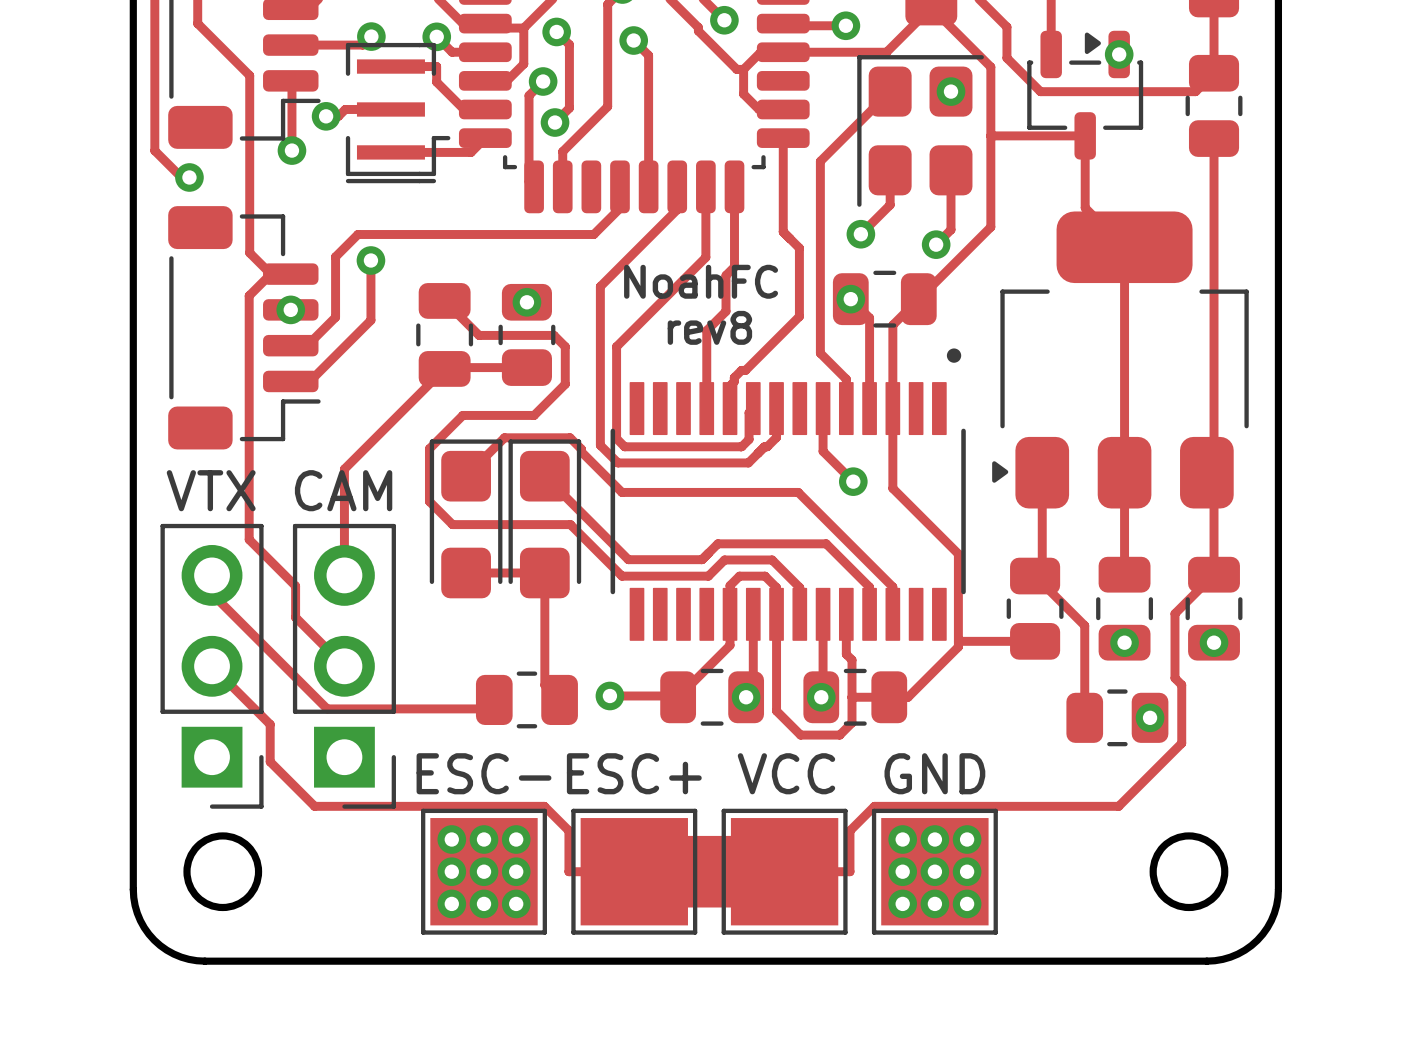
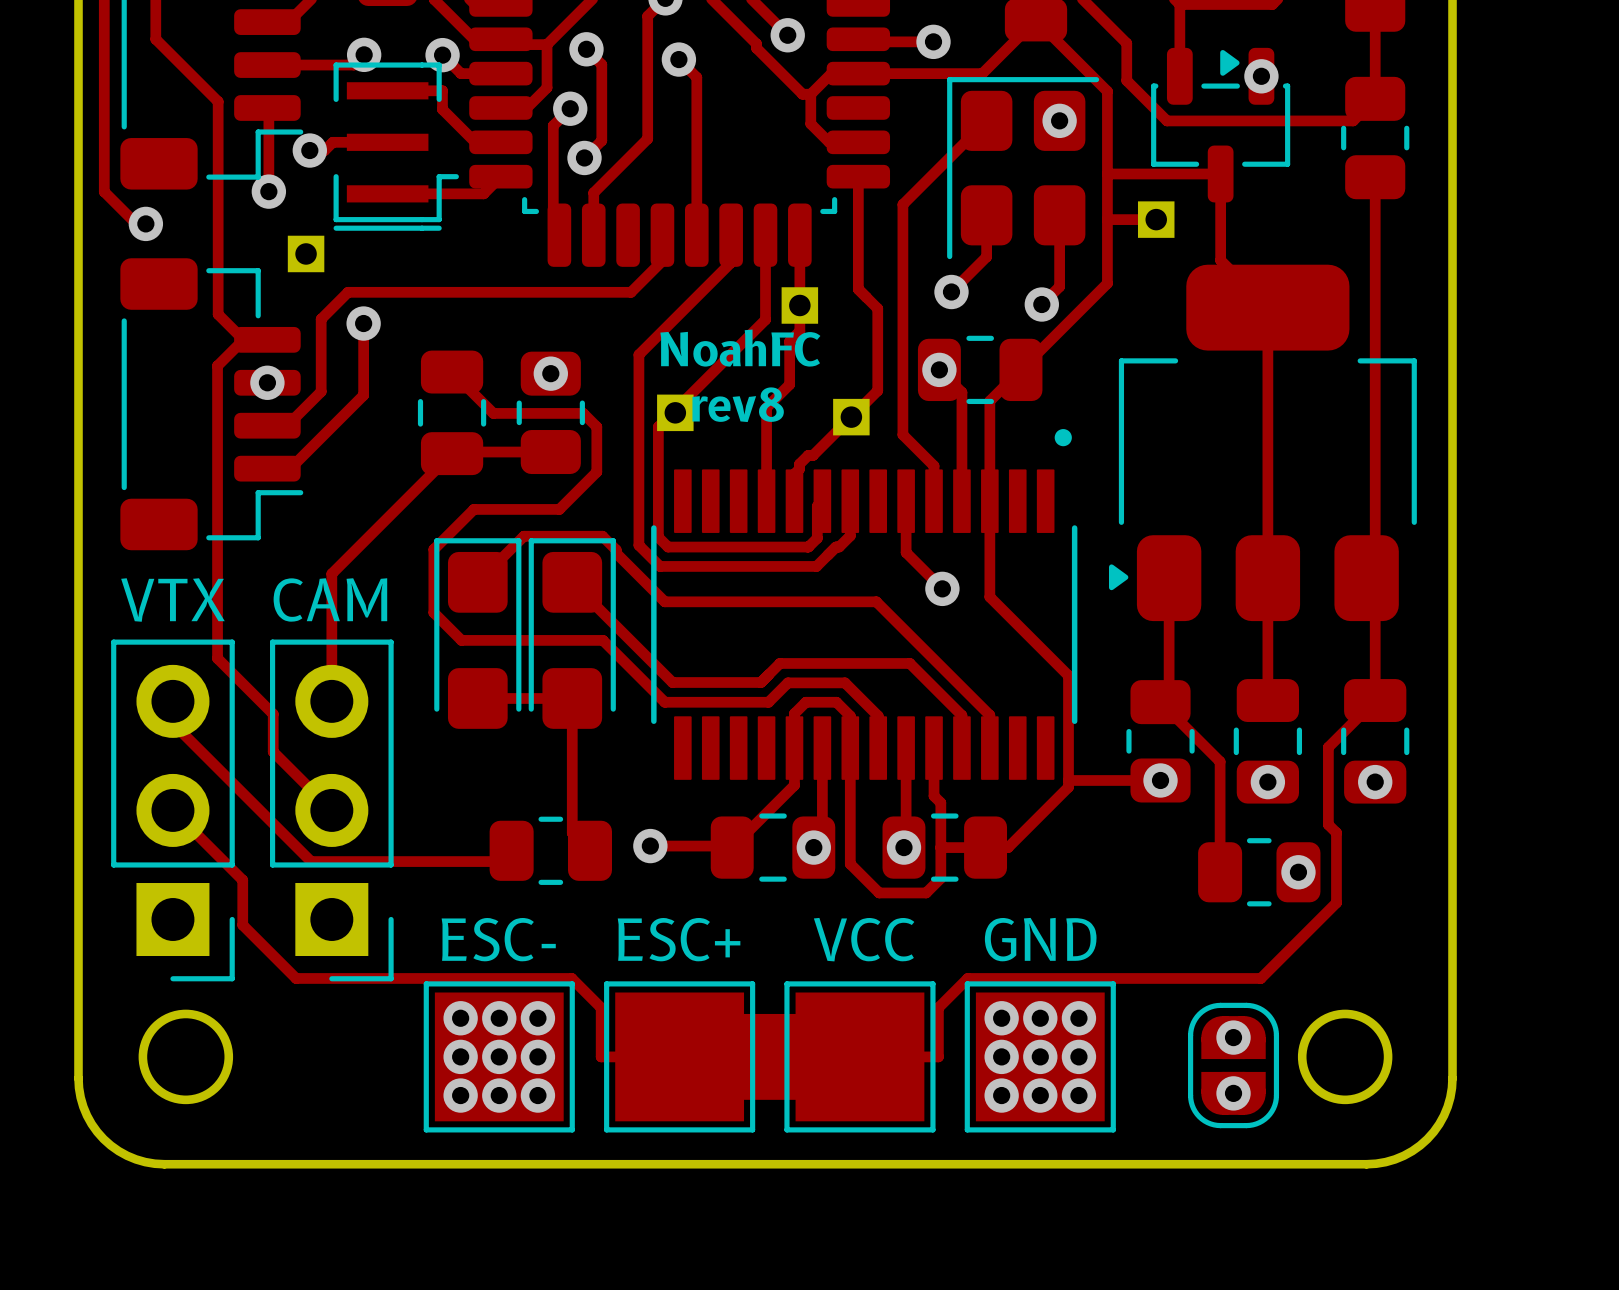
track: none -> (1107, 219) (1156, 219)
part: none -> (1156, 219)
part: none -> (306, 253)
part: none -> (799, 305)
part: none -> (675, 412)
part: none -> (851, 417)
via: none -> (1160, 780)
via: none -> (1233, 1037)
part: none -> (1233, 1065)
via: none -> (1233, 1093)

